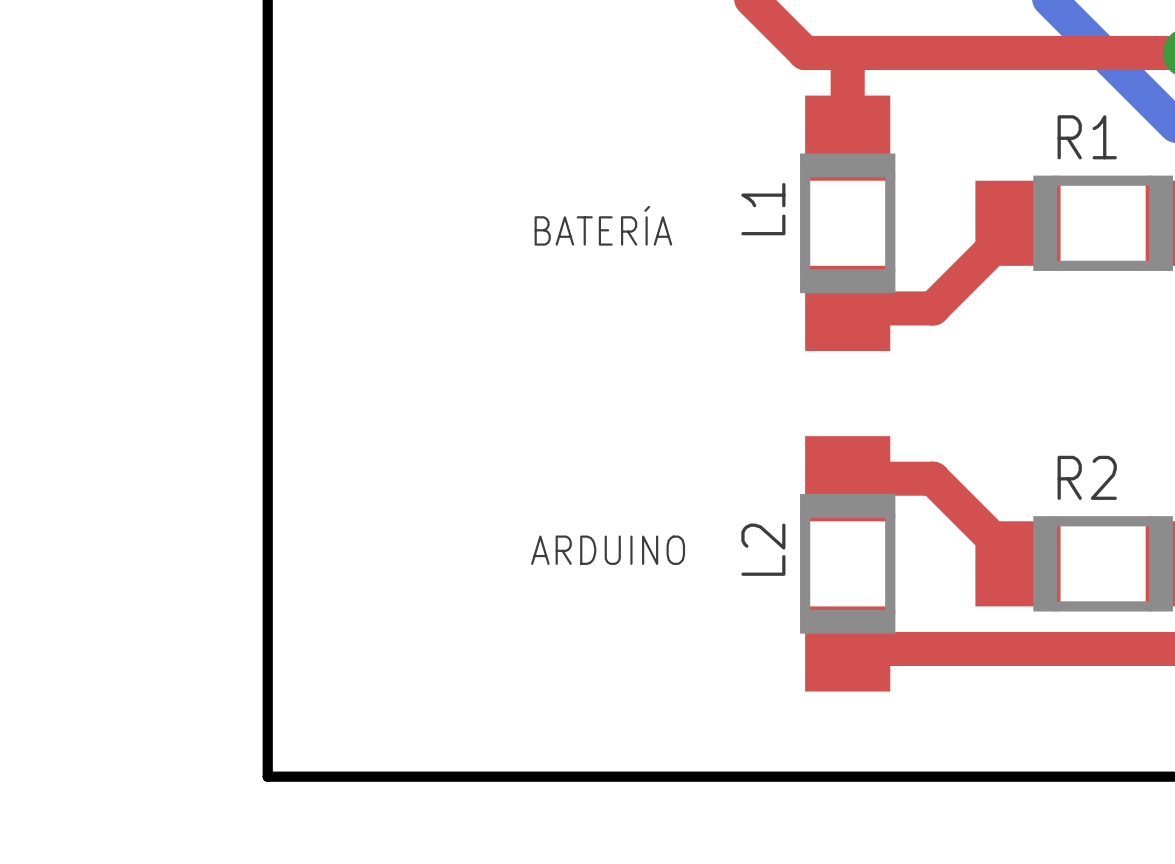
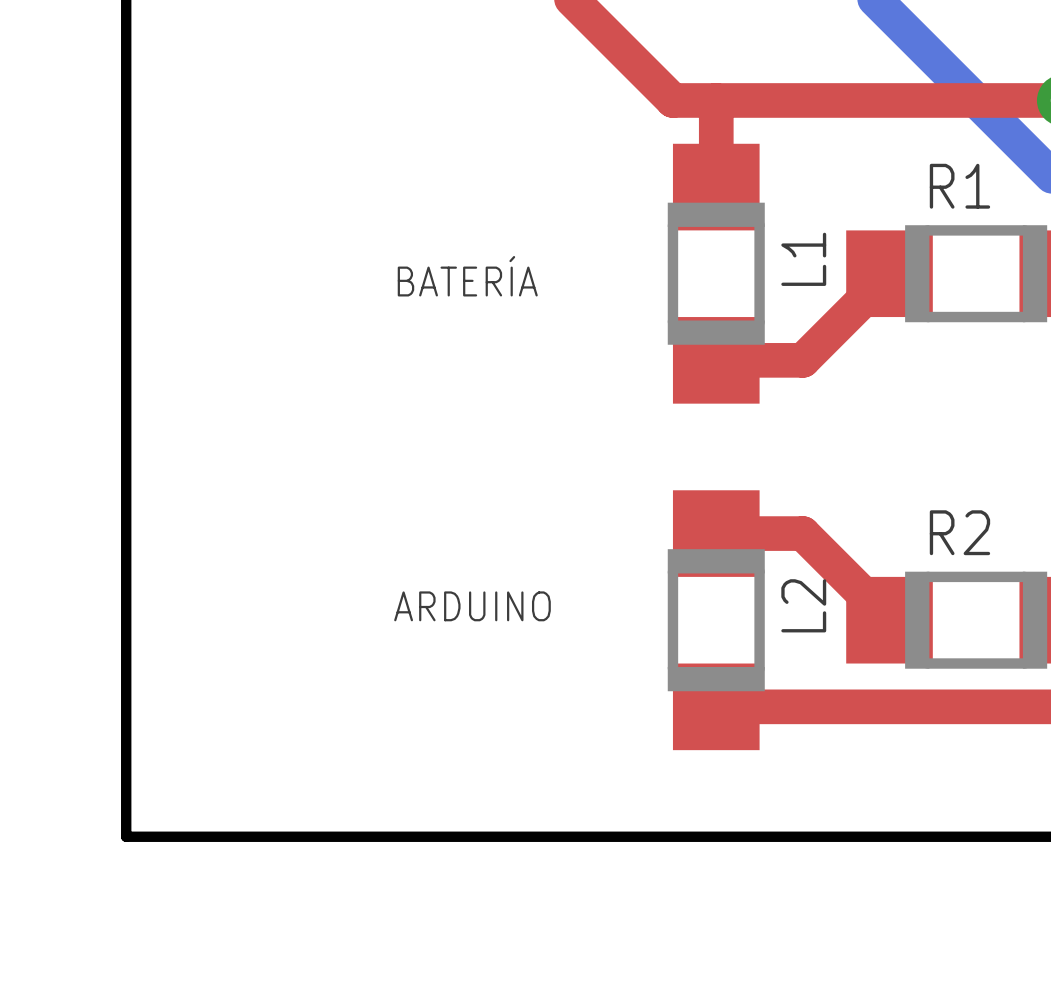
L1 name position: L1 (763, 209) -> L1 (803, 259)
L2 name position: L2 (763, 549) -> L2 (803, 605)

